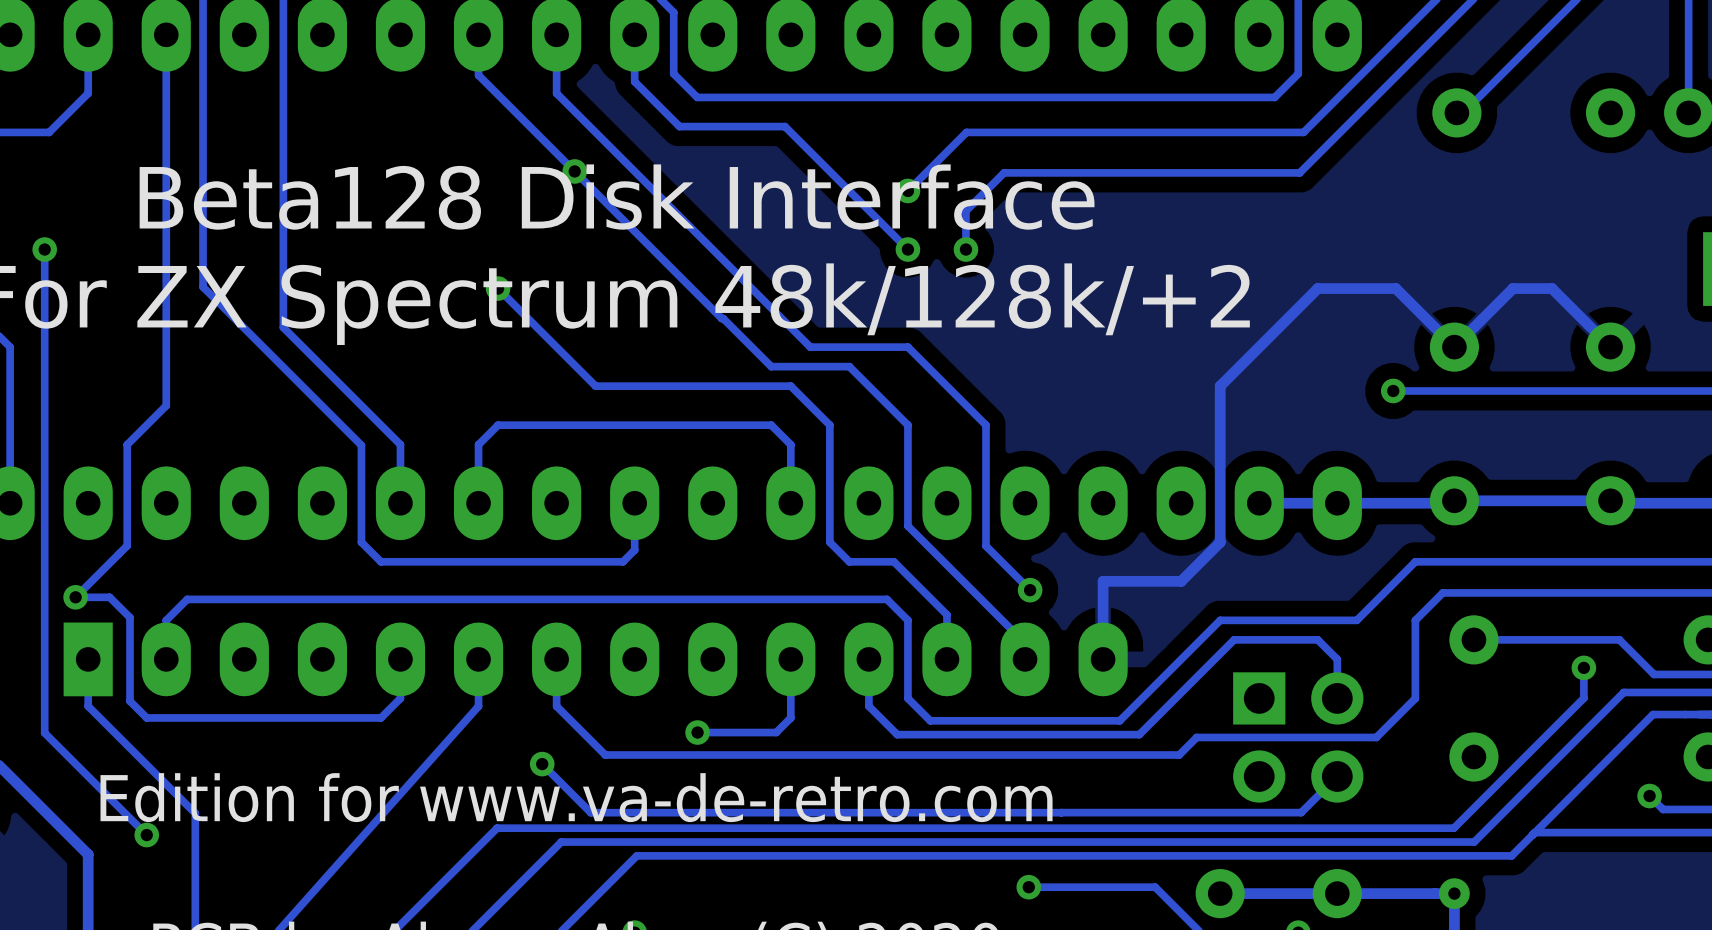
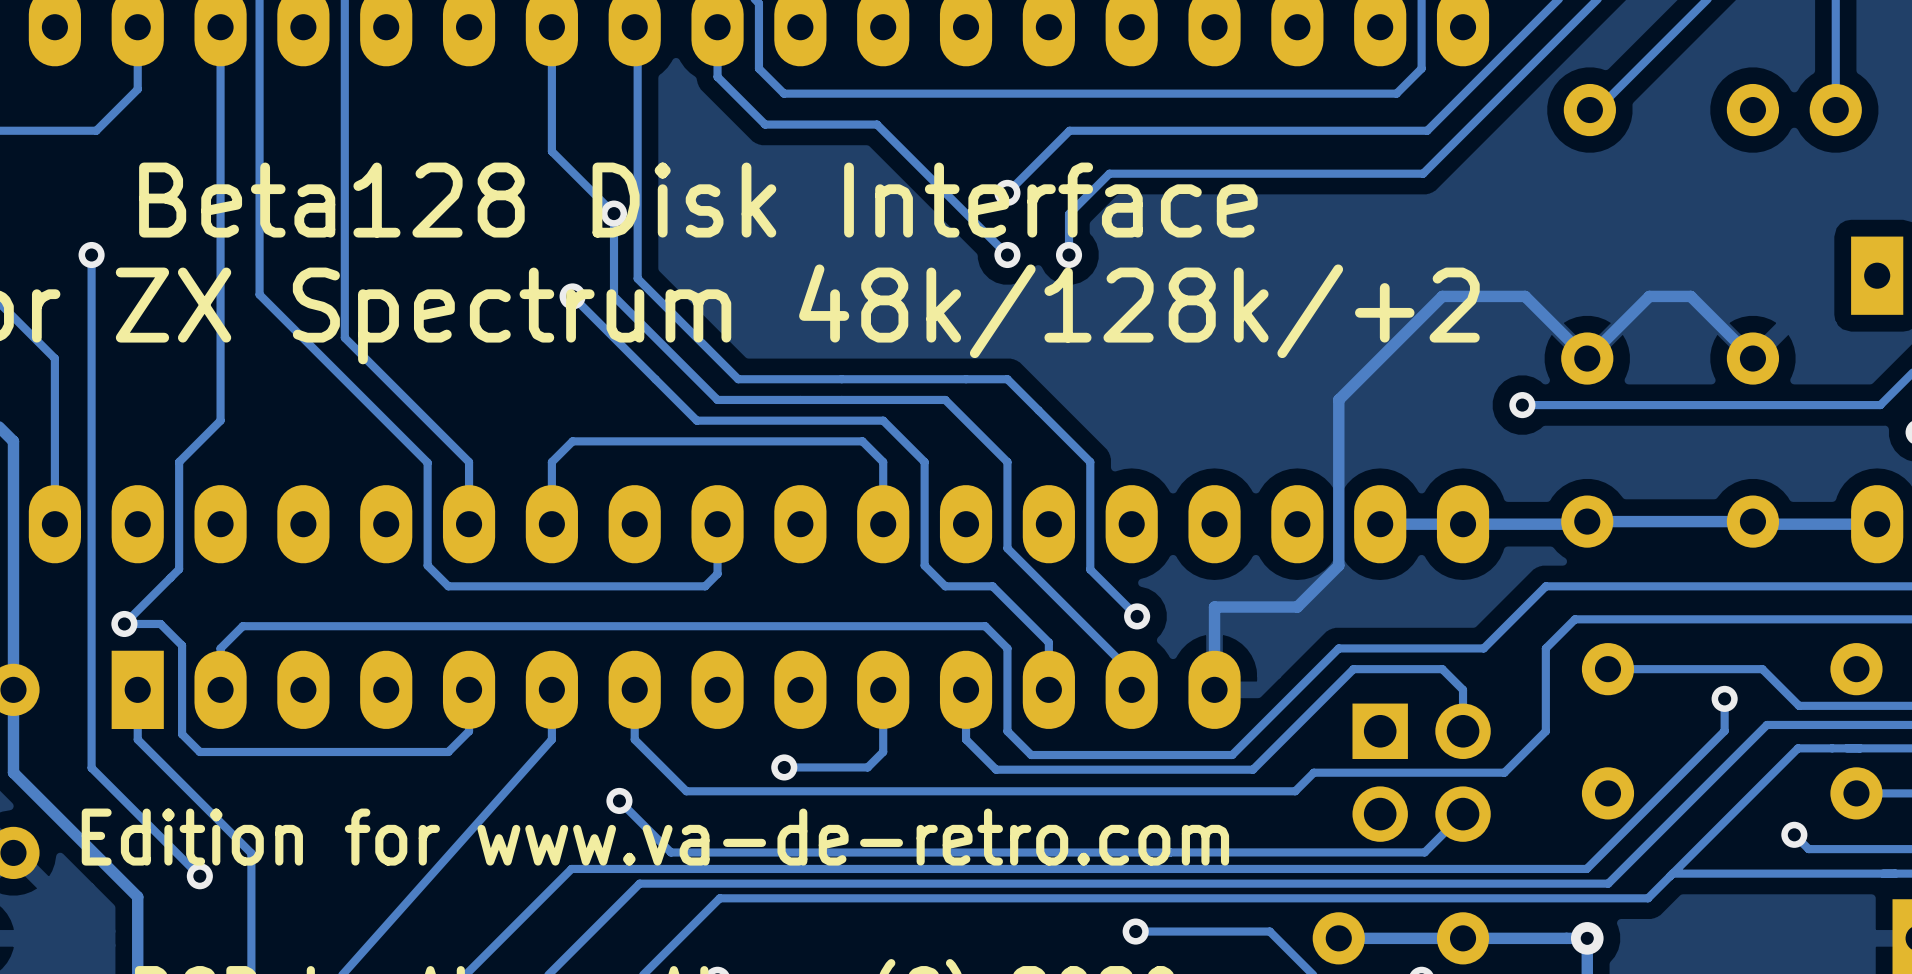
track: (556, 34) (556, 93) (810, 347) (907, 347) (986, 425) (986, 444) -> (945, 379) (1007, 379) (1090, 462)
track: (478, 75) (771, 366) -> (634, 27) (637, 30) (637, 278) (738, 379) (862, 379)
via position: (574, 171) -> (614, 213)
track: (849, 366) (907, 425) (907, 444) -> (883, 399) (945, 399) (1007, 462)
track: (634, 386) (595, 386) -> (717, 399) (614, 296) (614, 213) (551, 151) (551, 70)
track: (790, 386) (829, 425) (829, 444) -> (676, 399) (696, 420) (883, 420) (924, 462)

